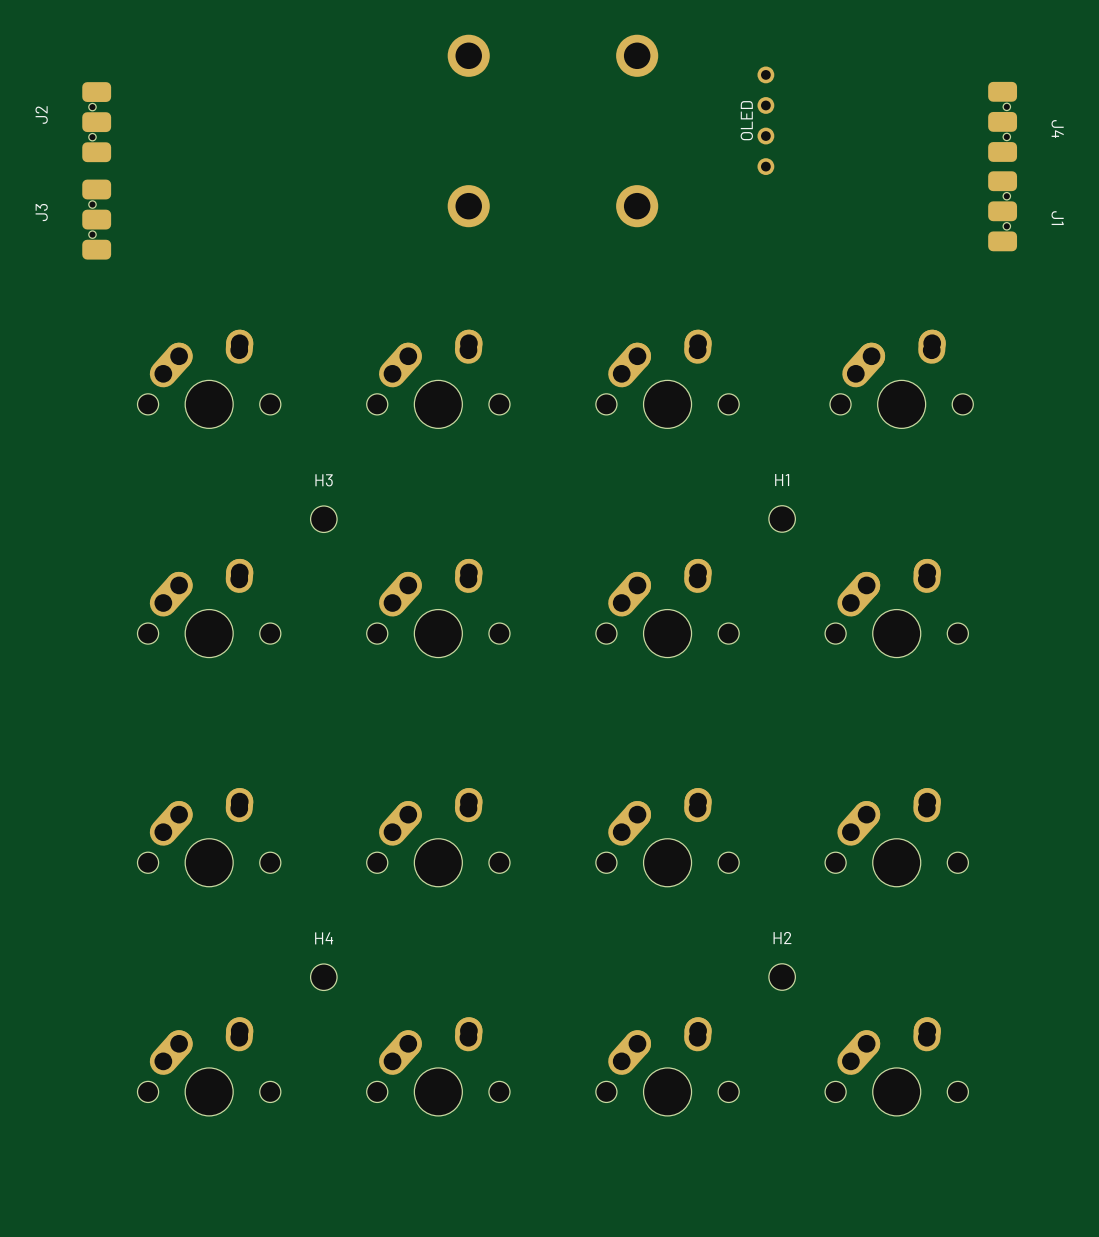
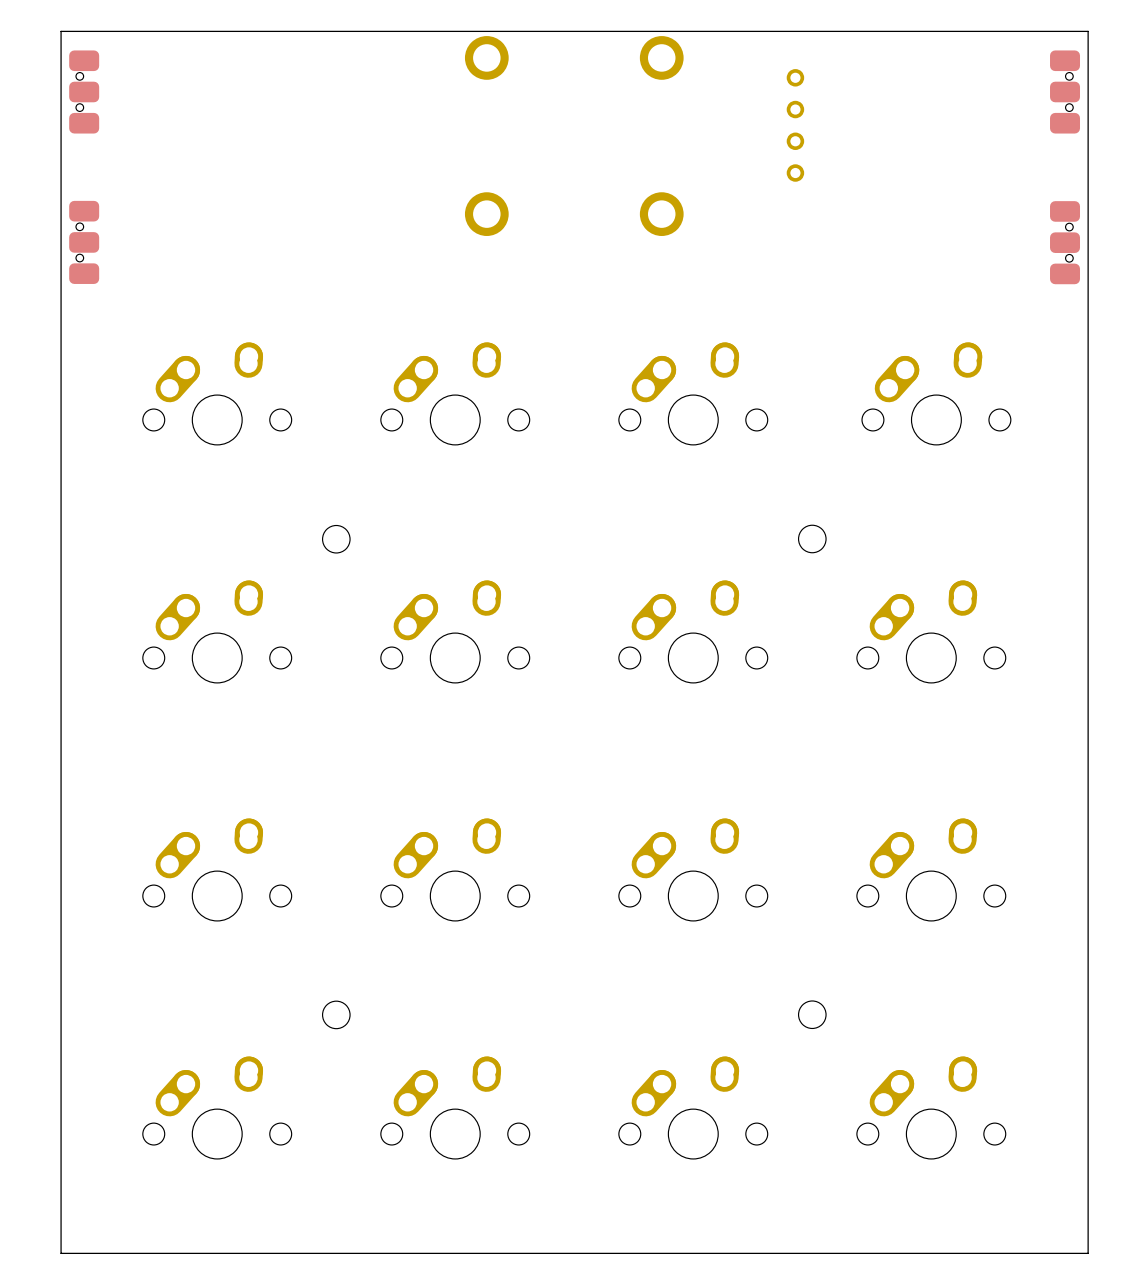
board edge: none -> (61, 31) (1088, 31) (1088, 1253) (61, 1253) (61, 31)
part: none -> (84, 91)
part: none -> (1065, 91)
part text: OLED (746, 120) -> none
J4: (1002, 121) -> none
J2: (96, 122) -> none
J1: (1002, 211) -> none
J3: (96, 219) -> none
part: none -> (84, 242)
part: none -> (1065, 242)
H3 name: H3 (324, 480) -> none
H1 name: H1 (782, 480) -> none
H4 name: H4 (324, 938) -> none
H2 name: H2 (782, 938) -> none

